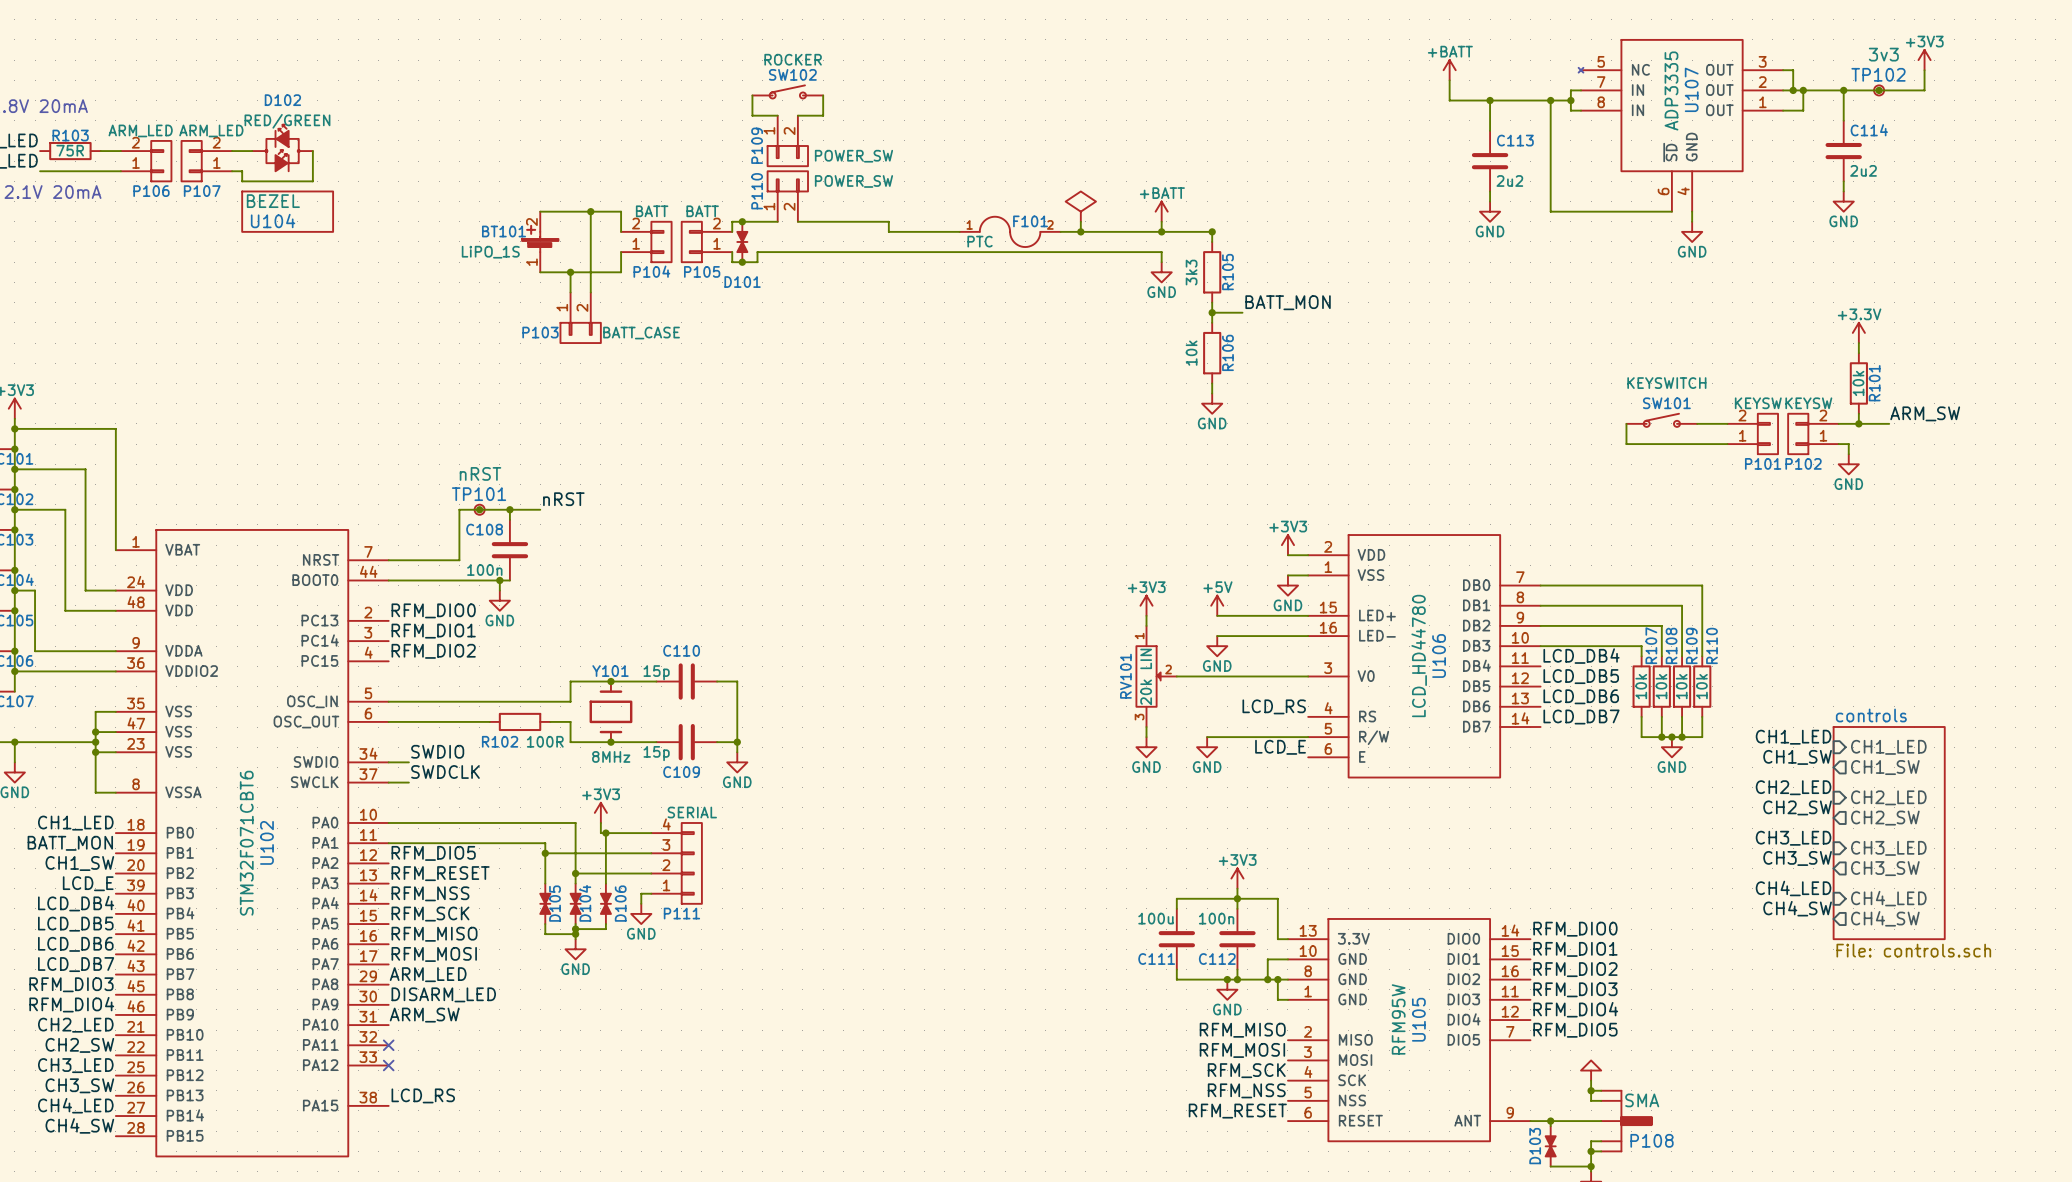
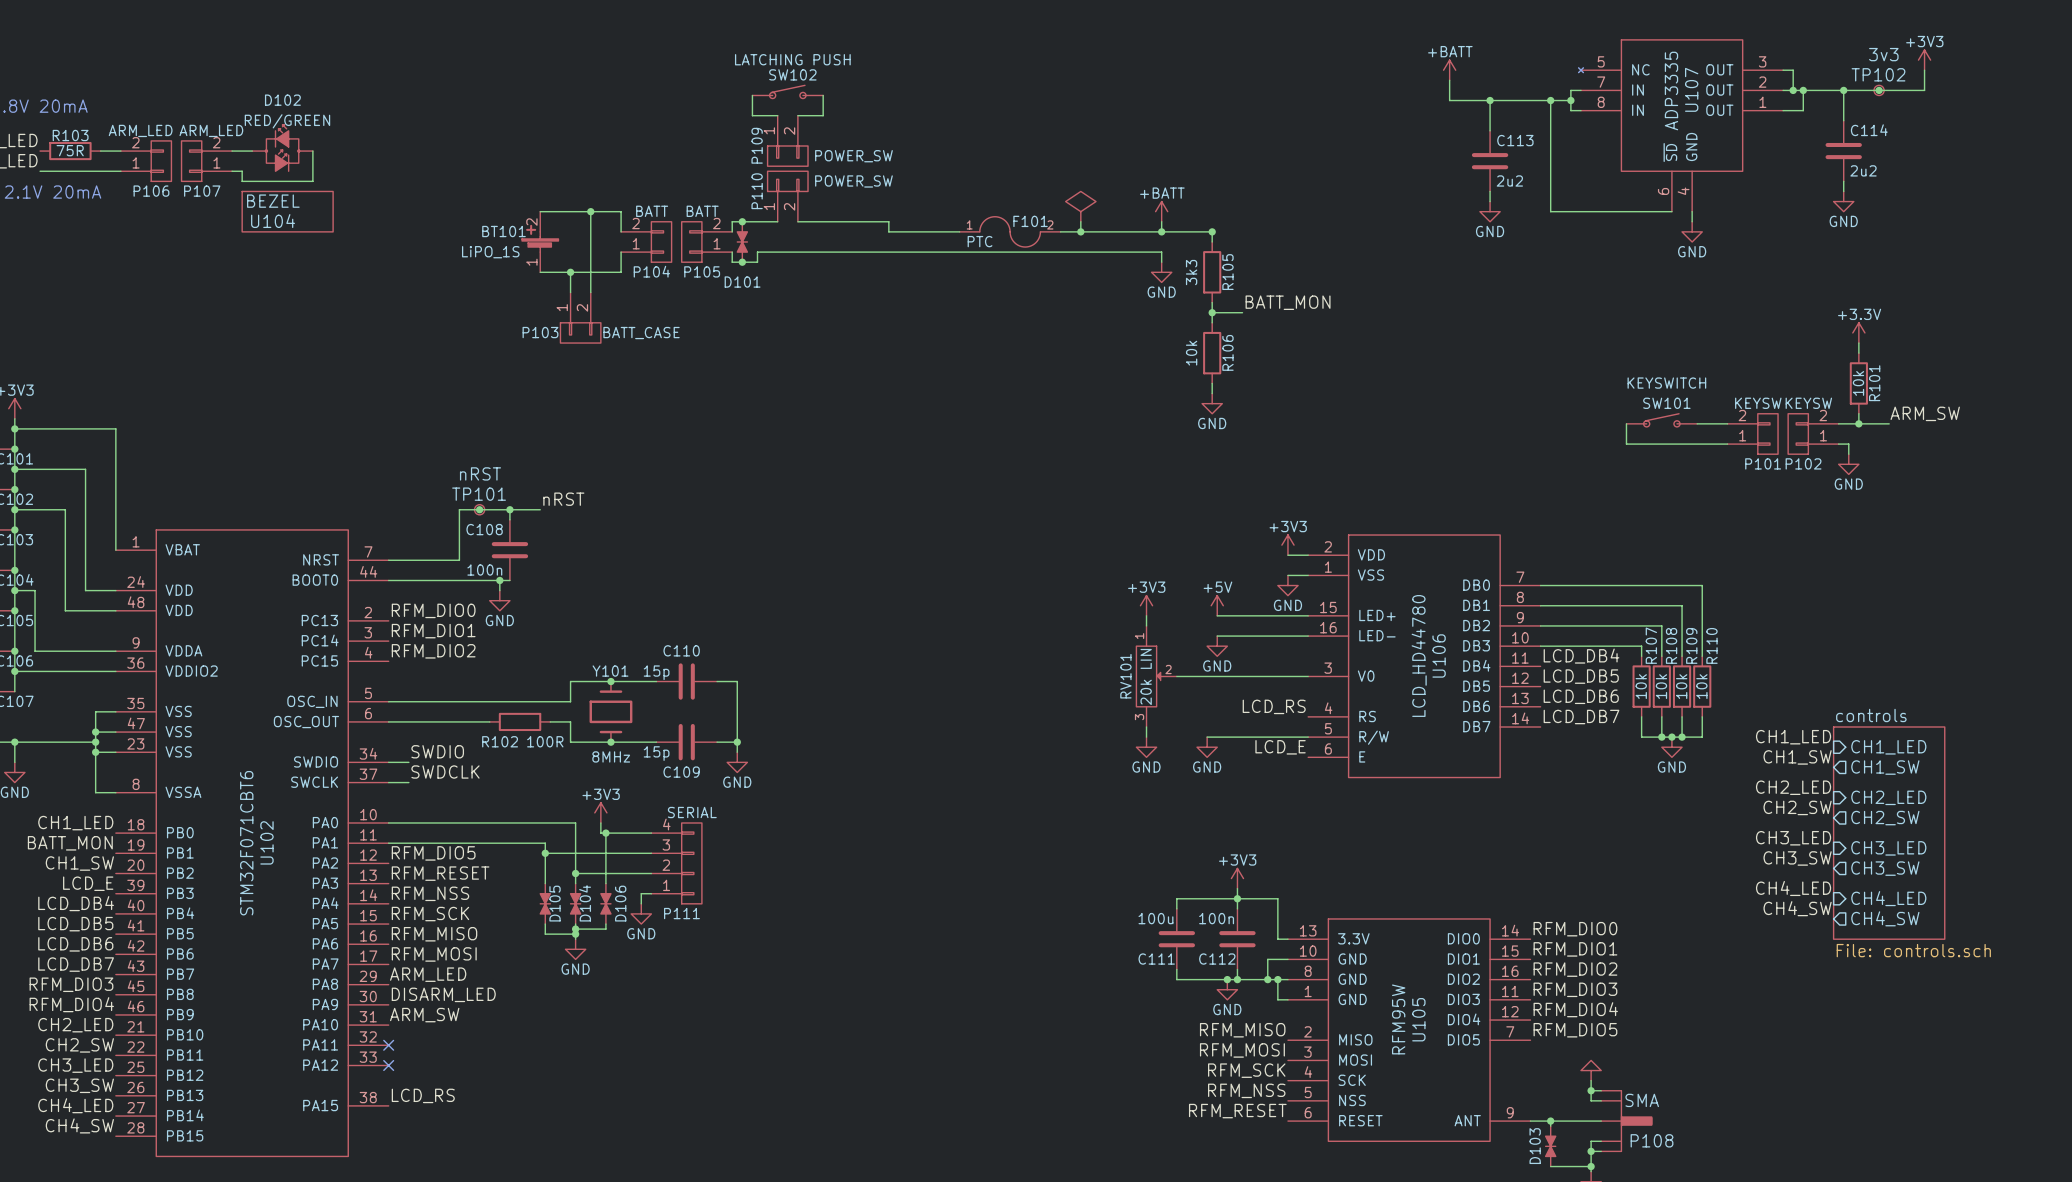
SW102 value: ROCKER (793, 59) -> LATCHING PUSH (792, 59)

